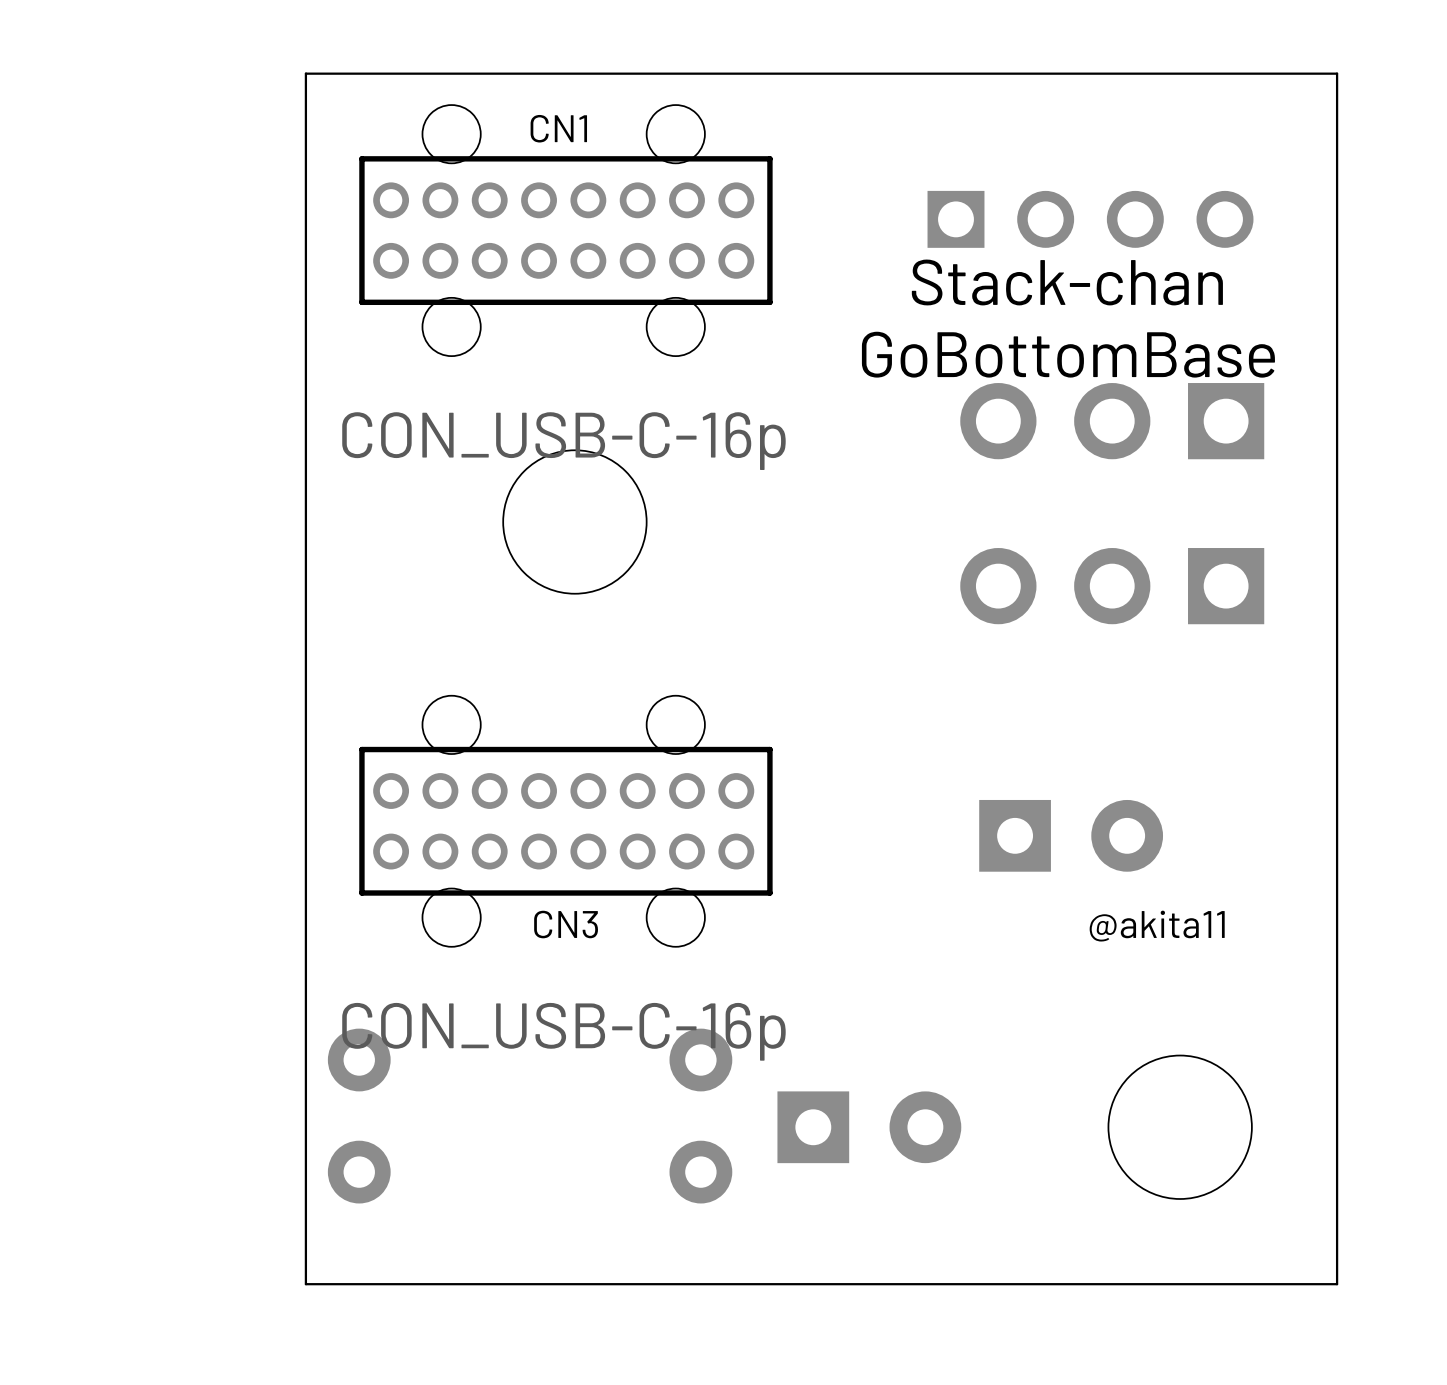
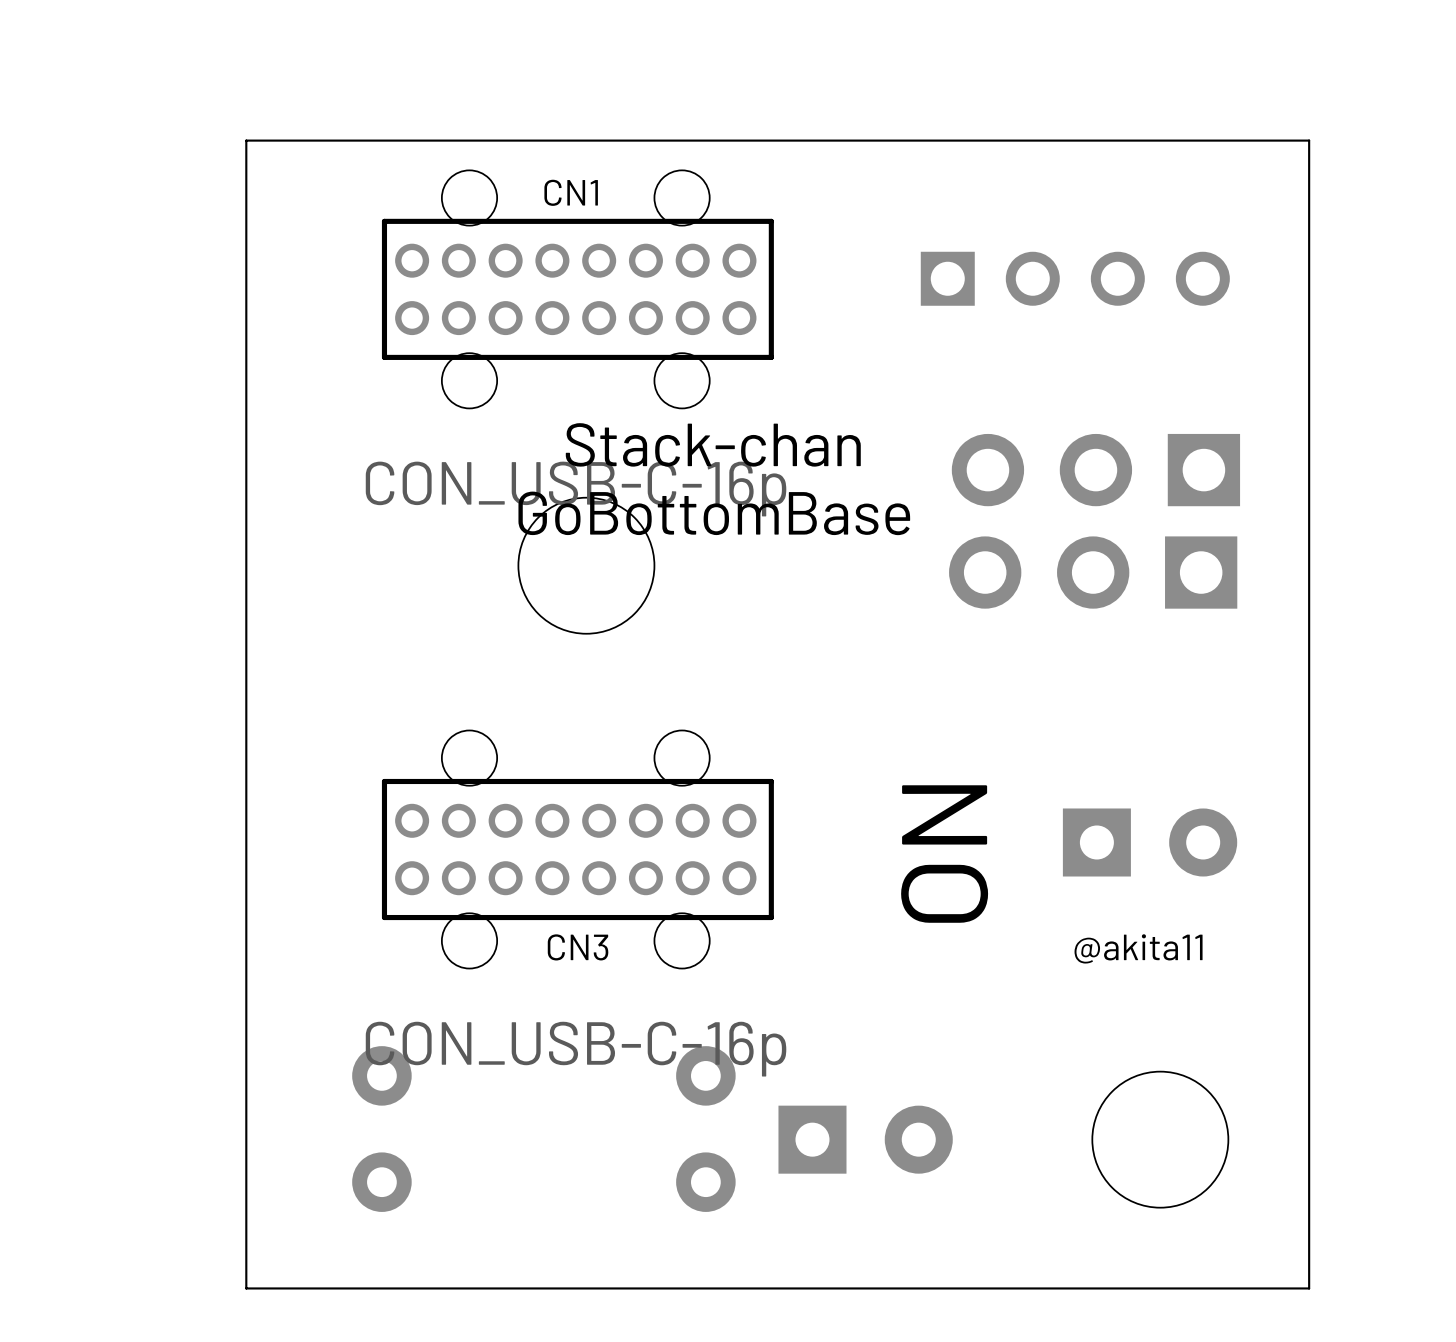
board edge: (305, 73) (305, 1284) -> (331, 140) (246, 140) (246, 1288) (331, 1288)
text position: Stack-chan (1067, 282) -> Stack-chan (713, 444)
text position: GoBottomBase (1068, 354) -> GoBottomBase (714, 513)
part position: (1112, 586) -> (1093, 572)
text: none -> ON (944, 854)
part position: (1071, 835) -> (1150, 842)

